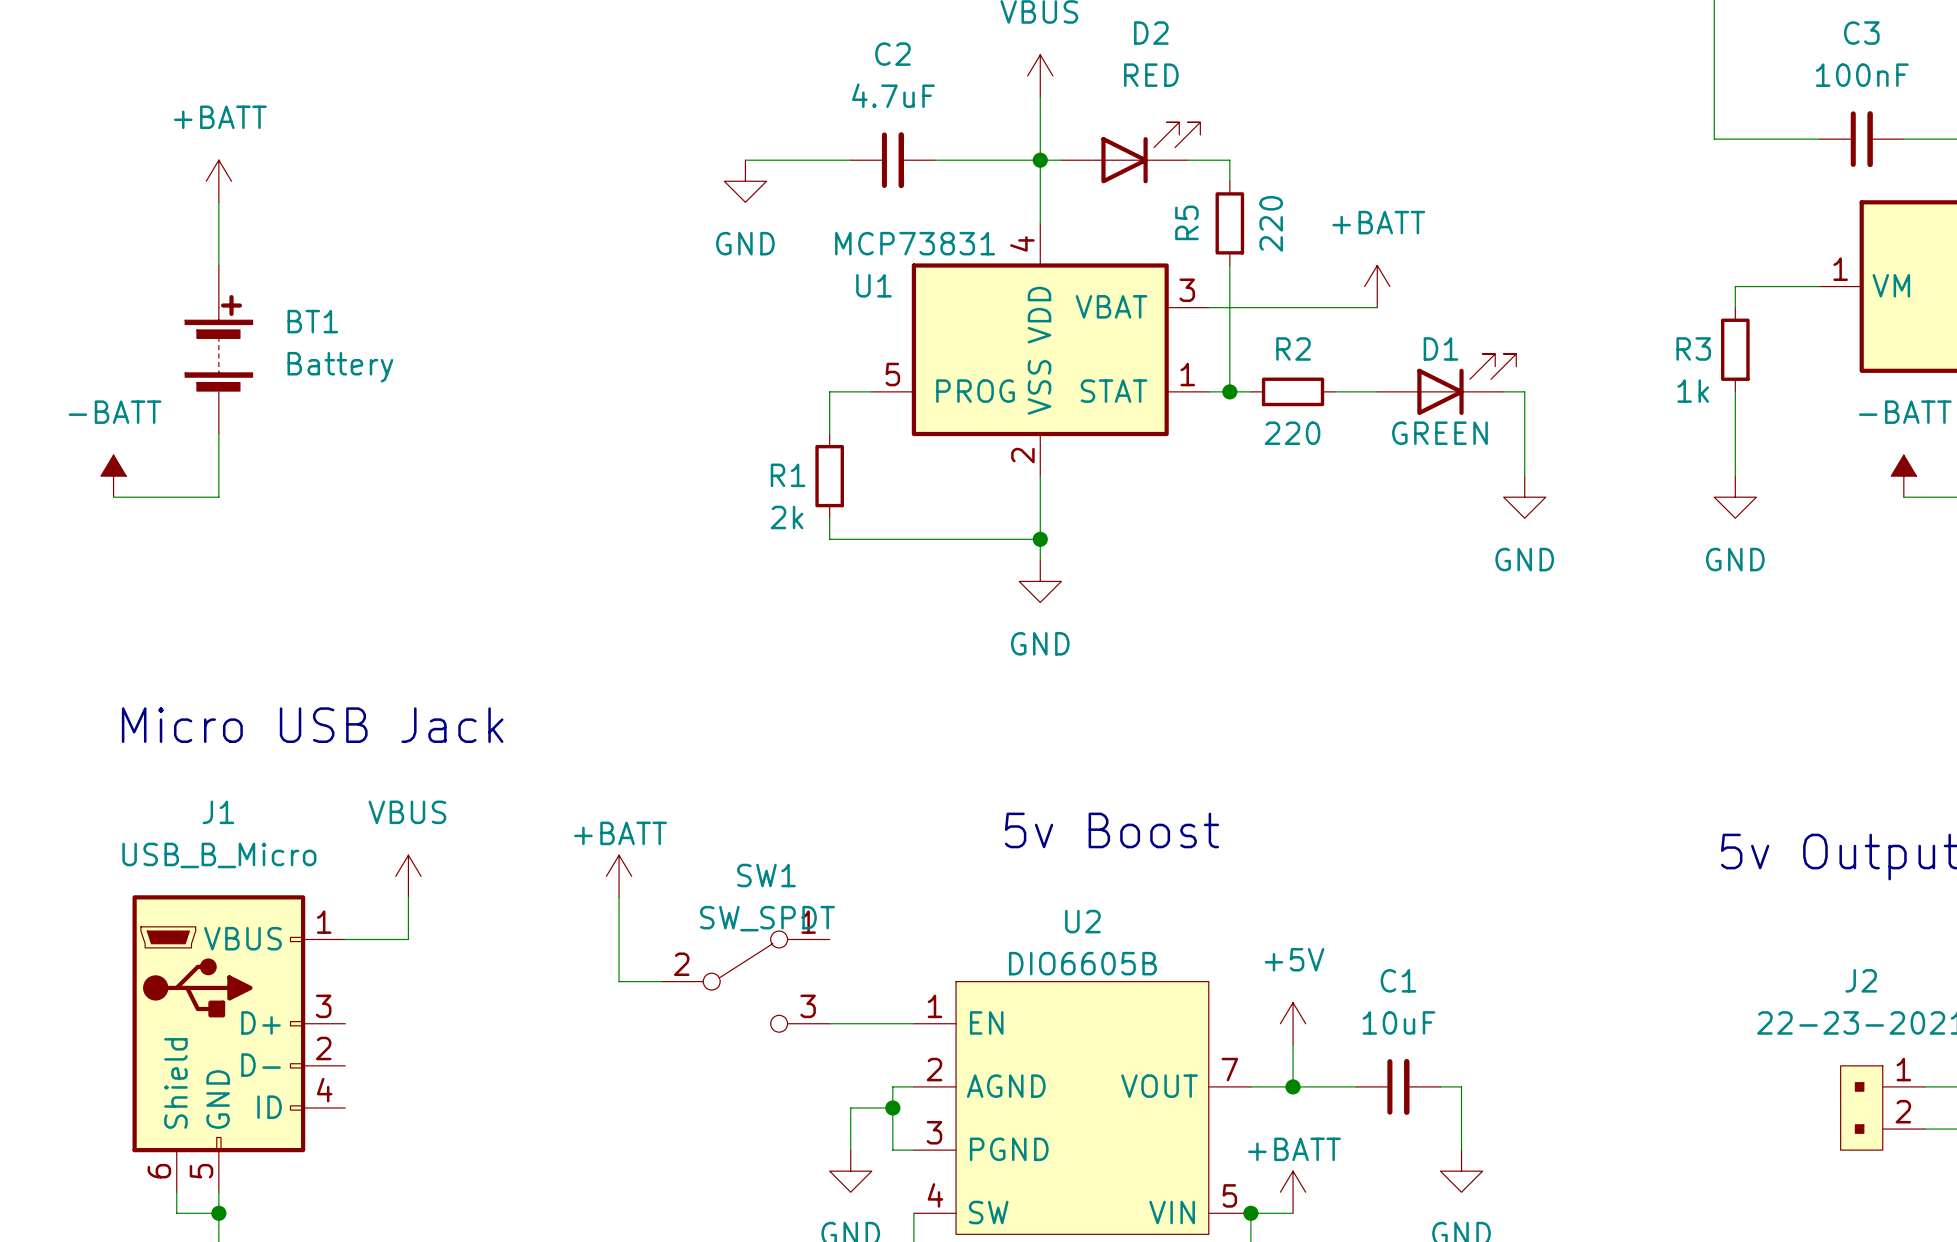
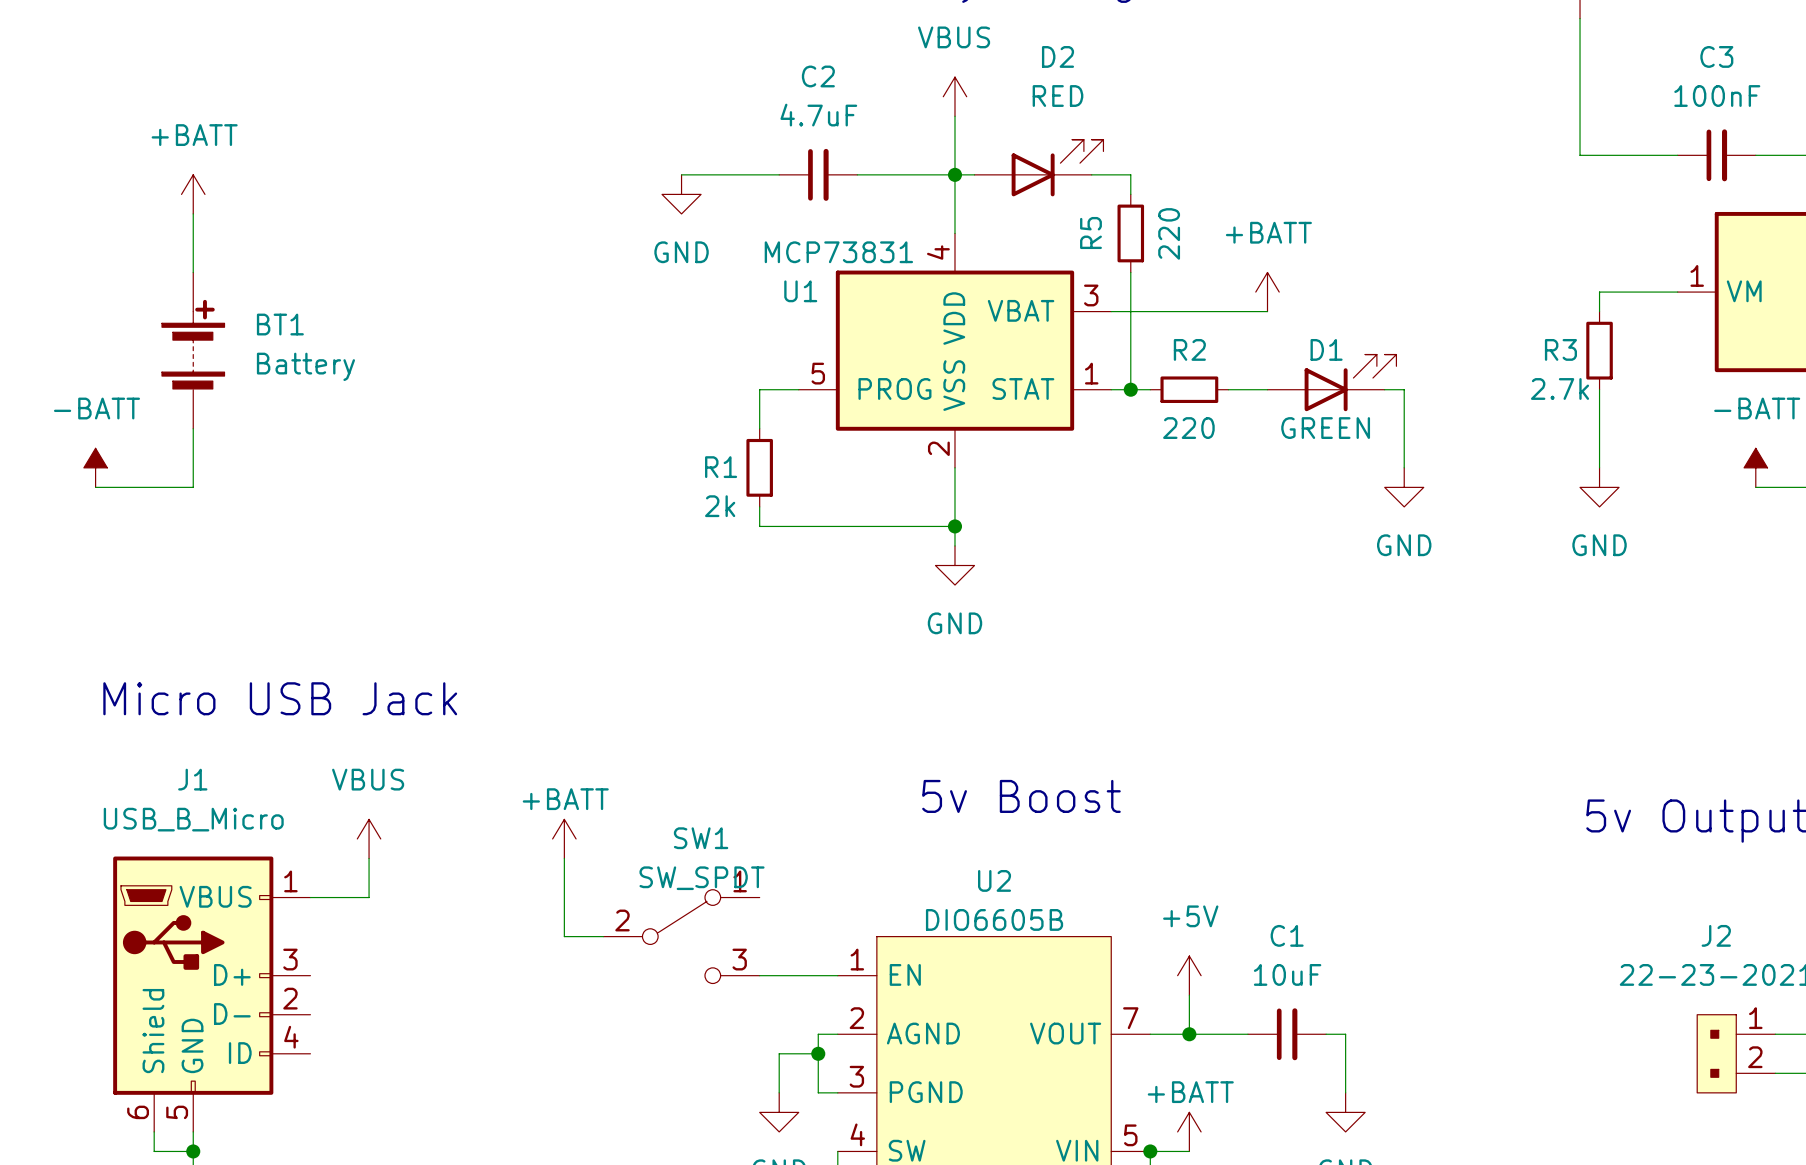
R3 value: 1k (1693, 391) -> 2.7k (1560, 388)

